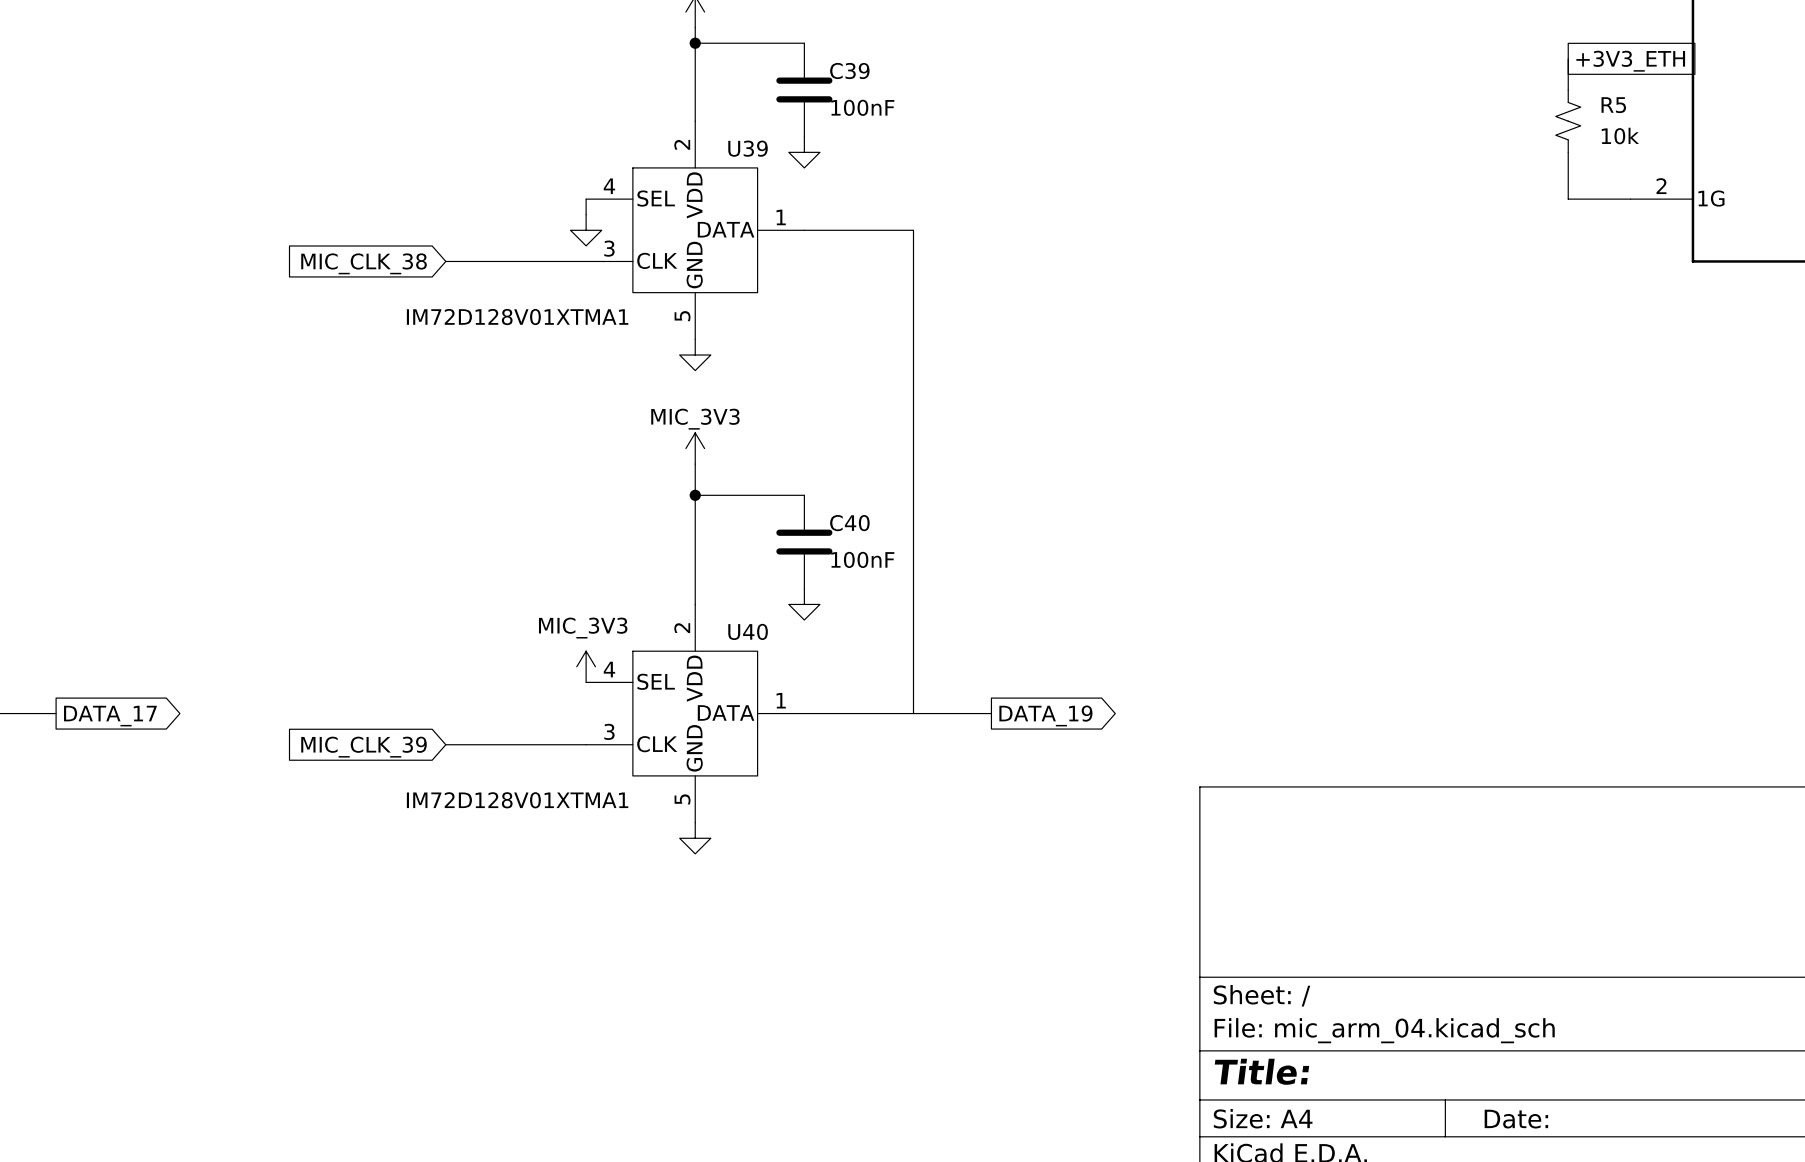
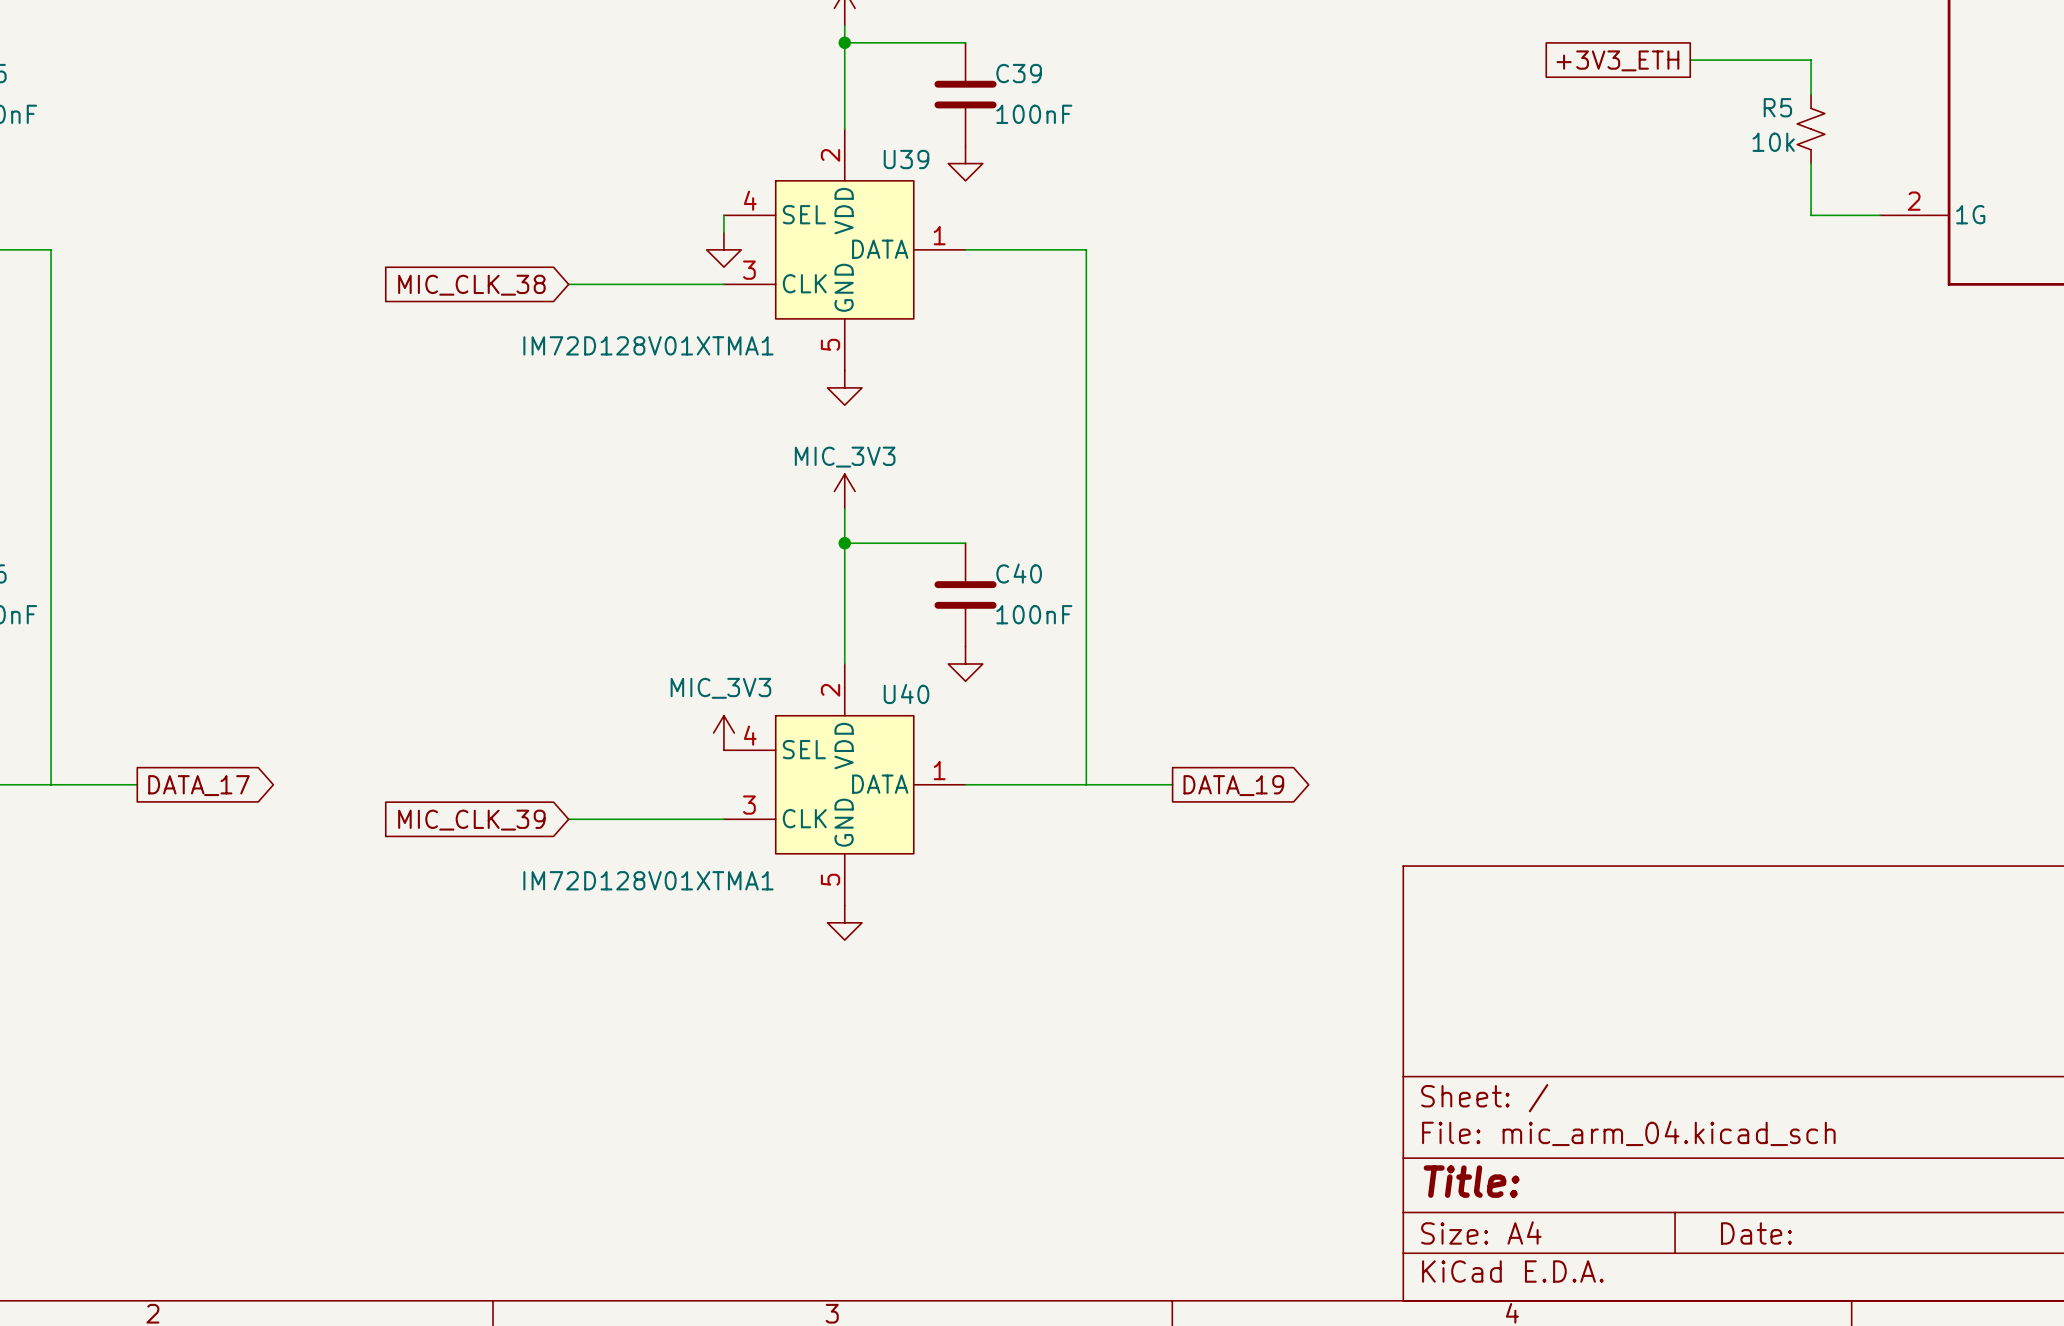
wire: none -> (1690, 60) (1811, 60)
global label rotation: 0° (1630, 61) -> 180° (1617, 60)
global label position: +3V3_ETH (1630, 61) -> +3V3_ETH (1617, 60)
R5 name position: R5 (1613, 105) -> R5 (1777, 107)
R5 value position: 10k (1620, 136) -> 10k (1773, 142)

